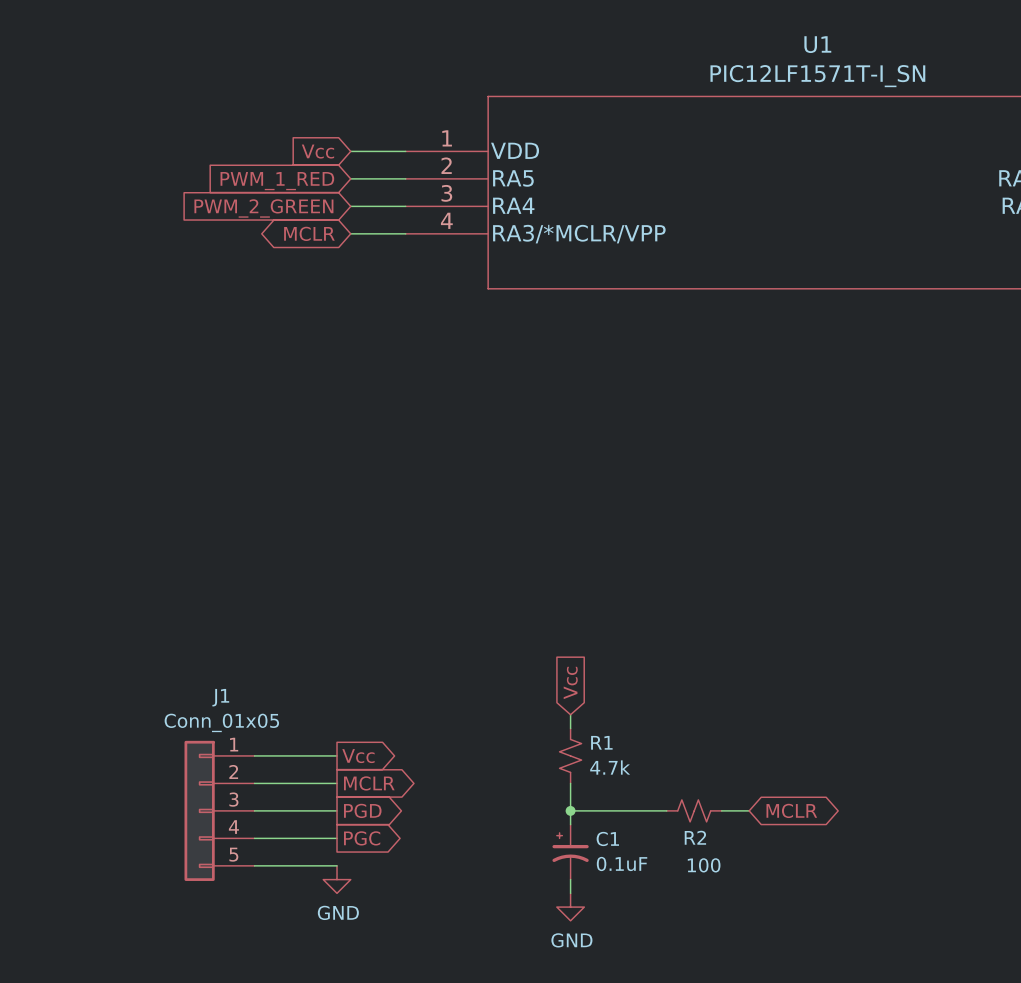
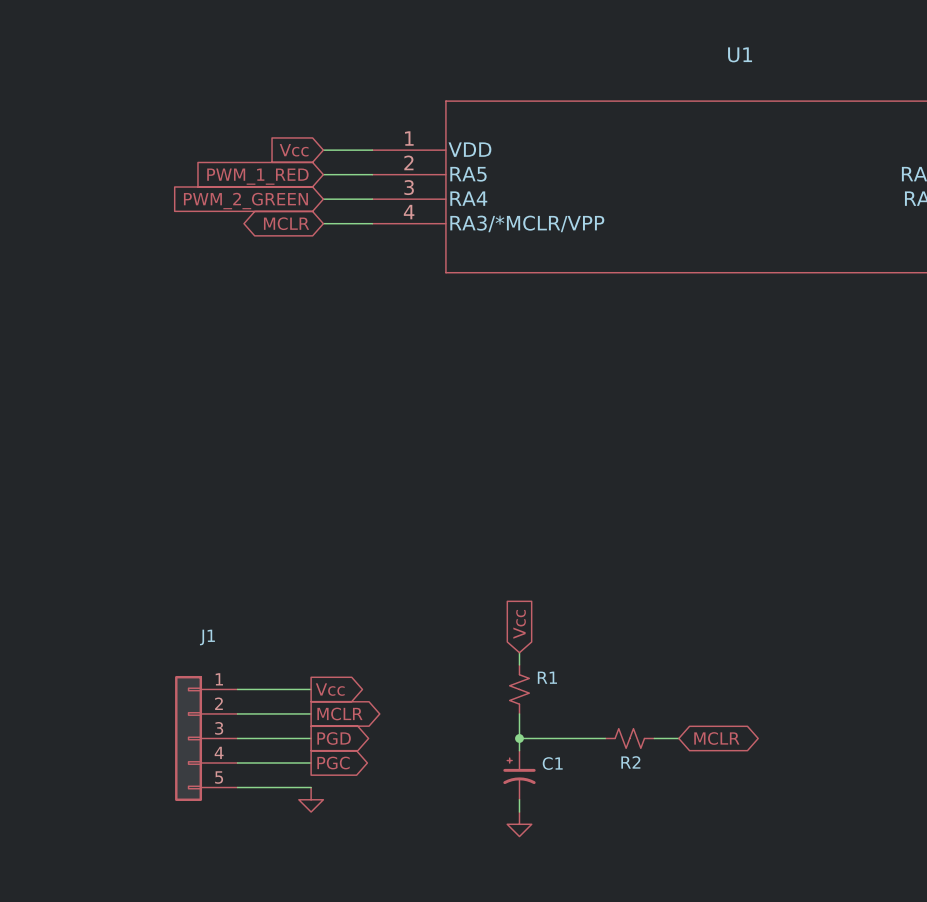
U1 value: PIC12LF1571T-I_SN (817, 76) -> none
J1 value: Conn_01x05 (221, 722) -> none
R1 value: 4.7k (610, 767) -> none
C1 value: 0.1uF (622, 863) -> none
R2 value: 100 (704, 865) -> none
power symbol text: GND (338, 912) -> none
power symbol text: GND (571, 940) -> none

